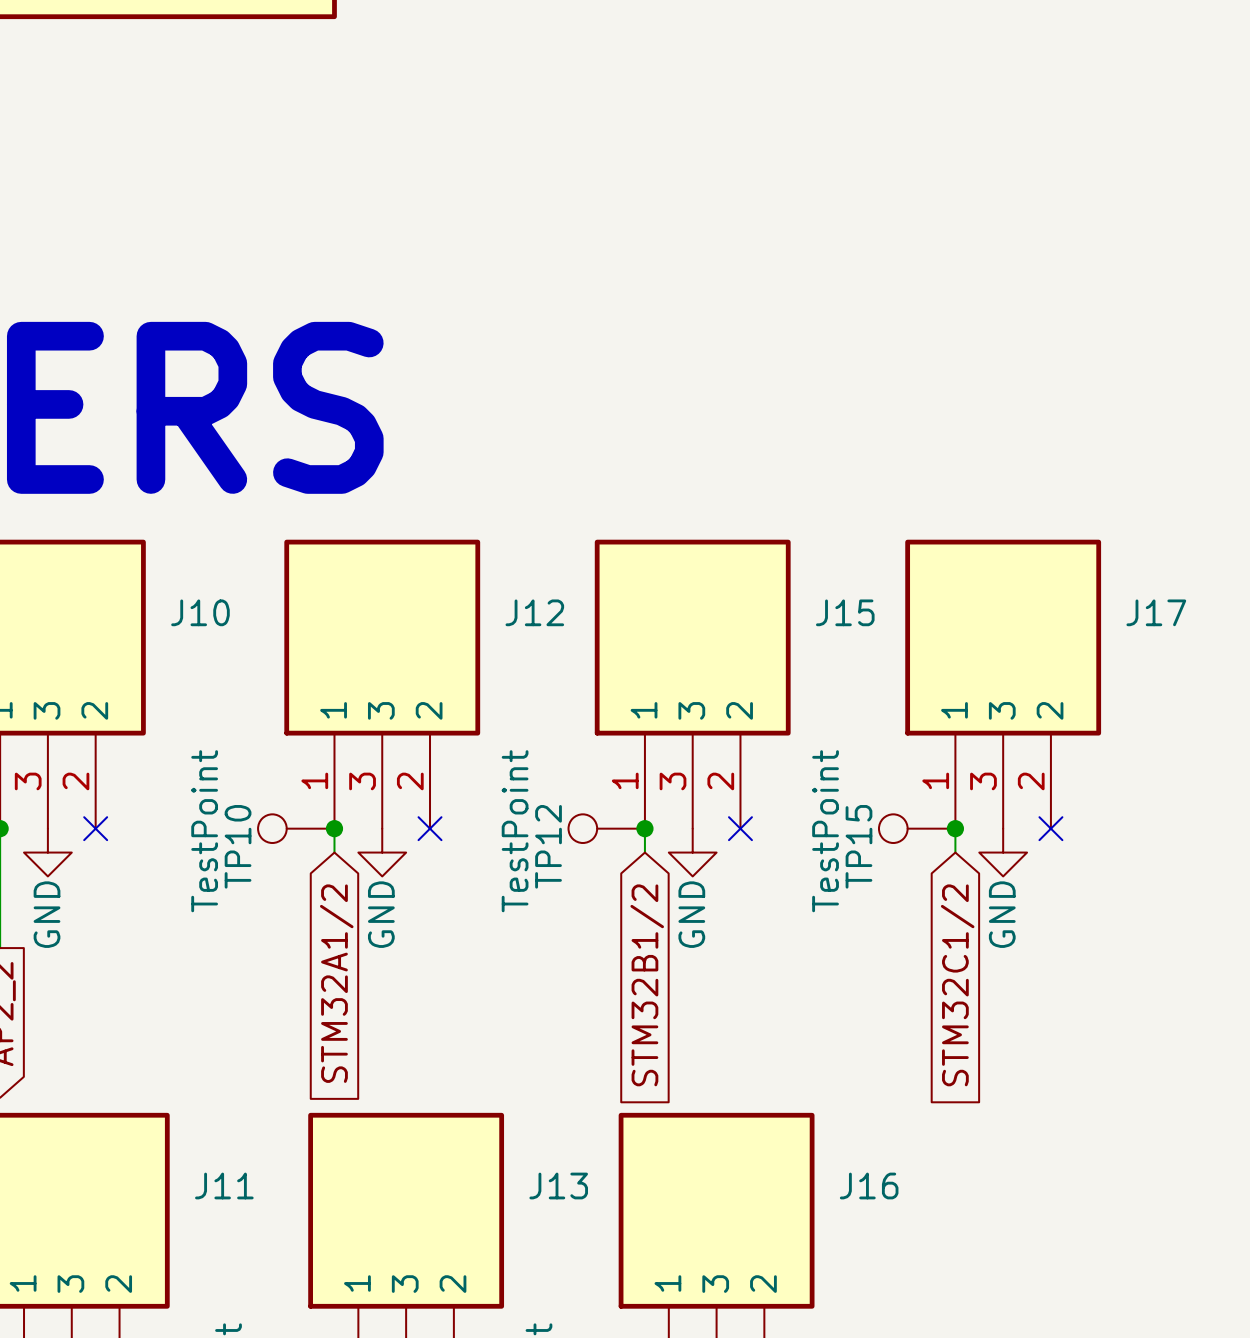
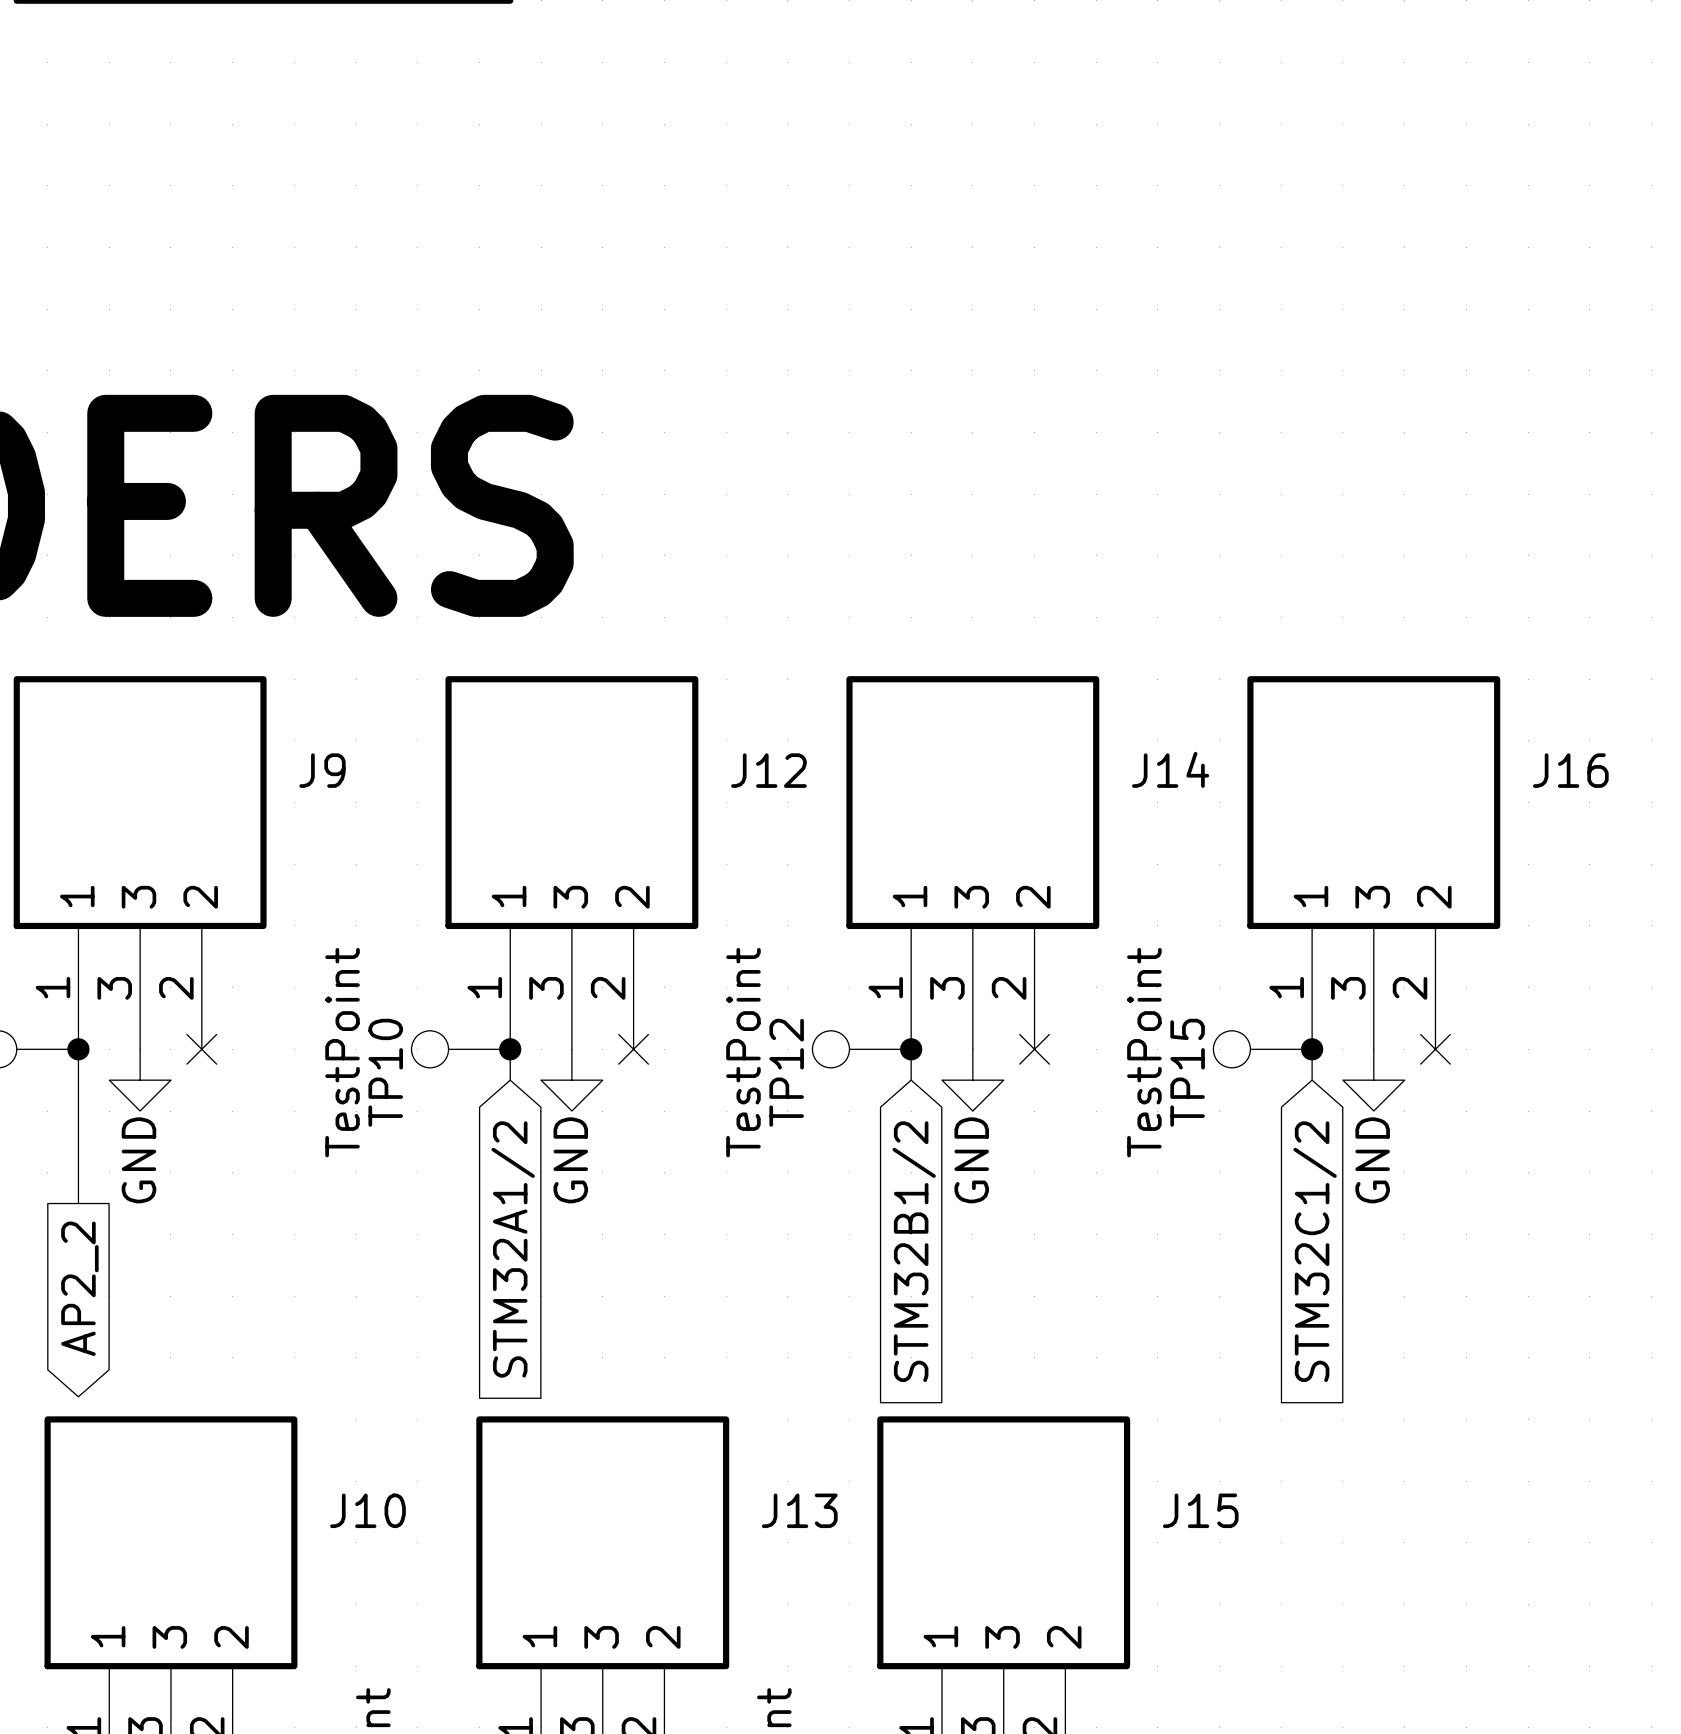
J10 name: J10 (200, 612) -> J9 (322, 770)
J15 name: J15 (845, 612) -> J14 (1170, 769)
J17 name: J17 (1156, 612) -> J16 (1570, 770)
J11 name: J11 (224, 1186) -> J10 (368, 1510)
J16 name: J16 (869, 1186) -> J15 (1200, 1510)

